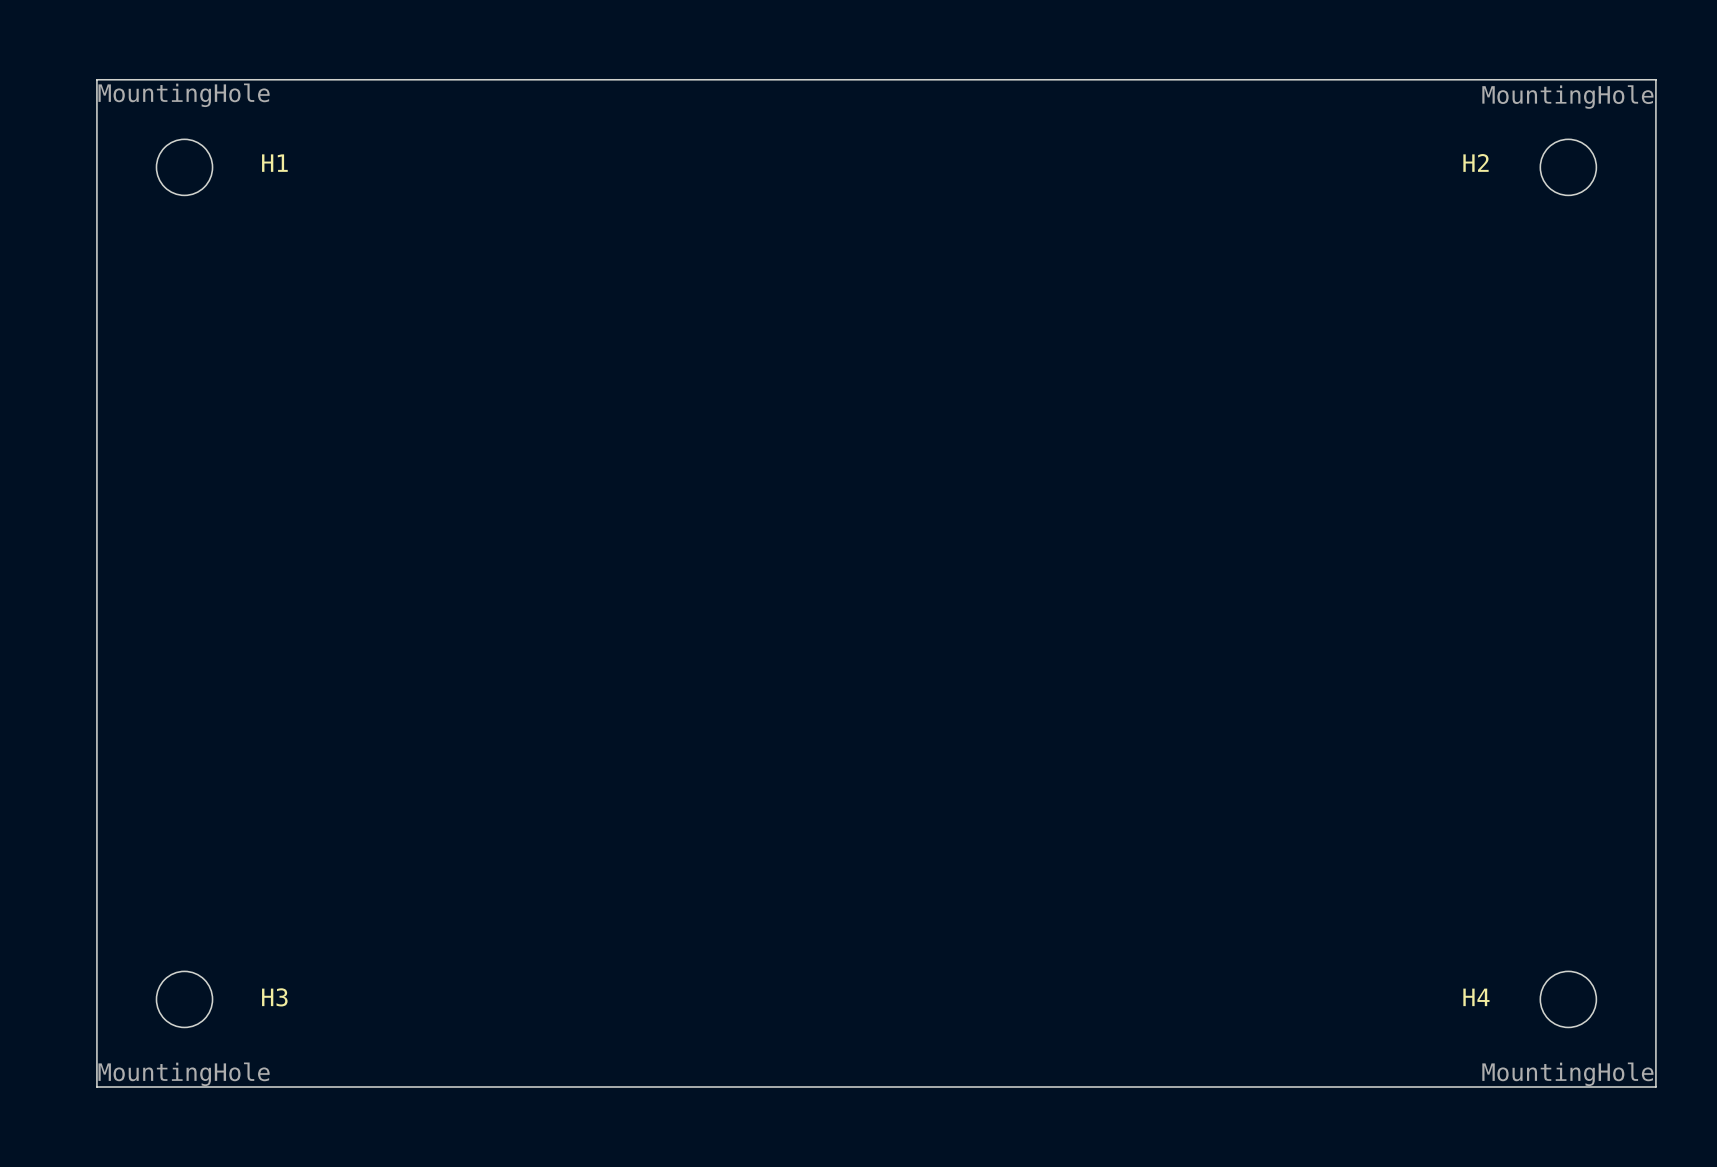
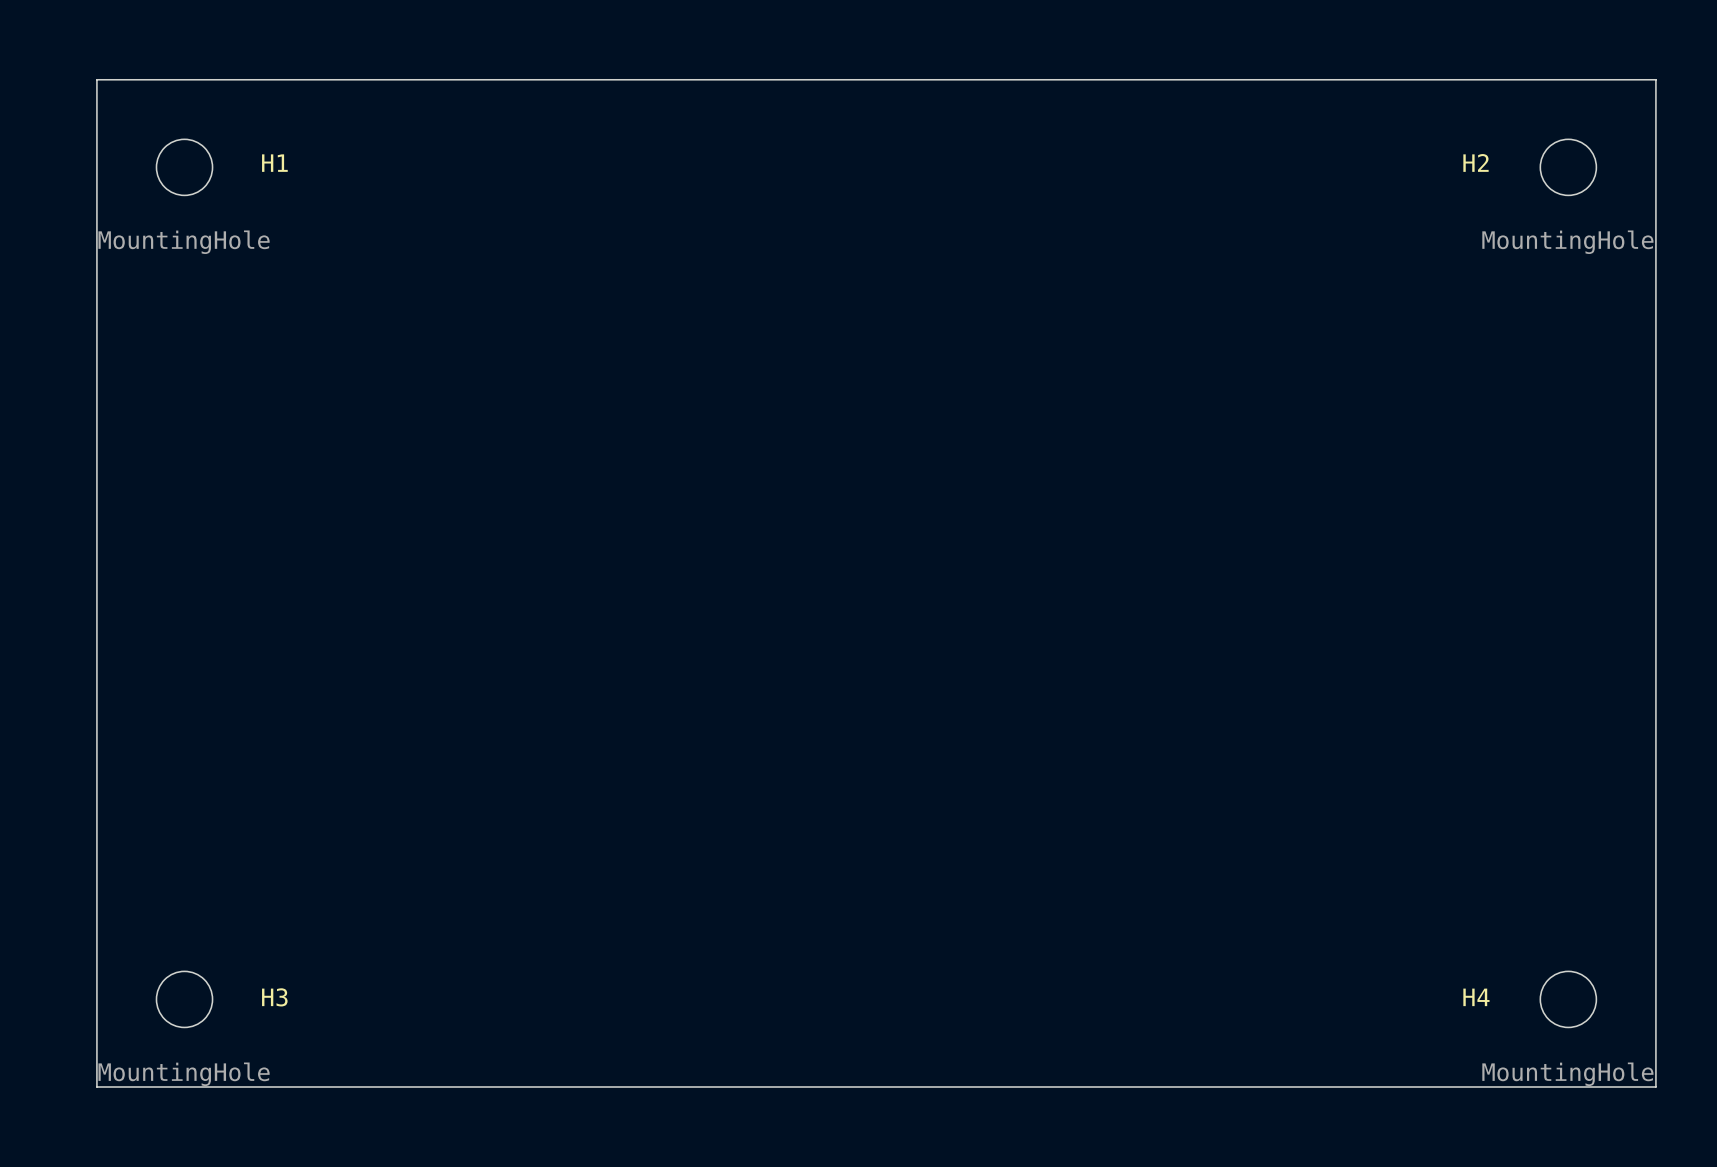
H1 value position: MountingHole (184, 95) -> MountingHole (184, 242)
H2 value position: MountingHole (1567, 97) -> MountingHole (1567, 242)

